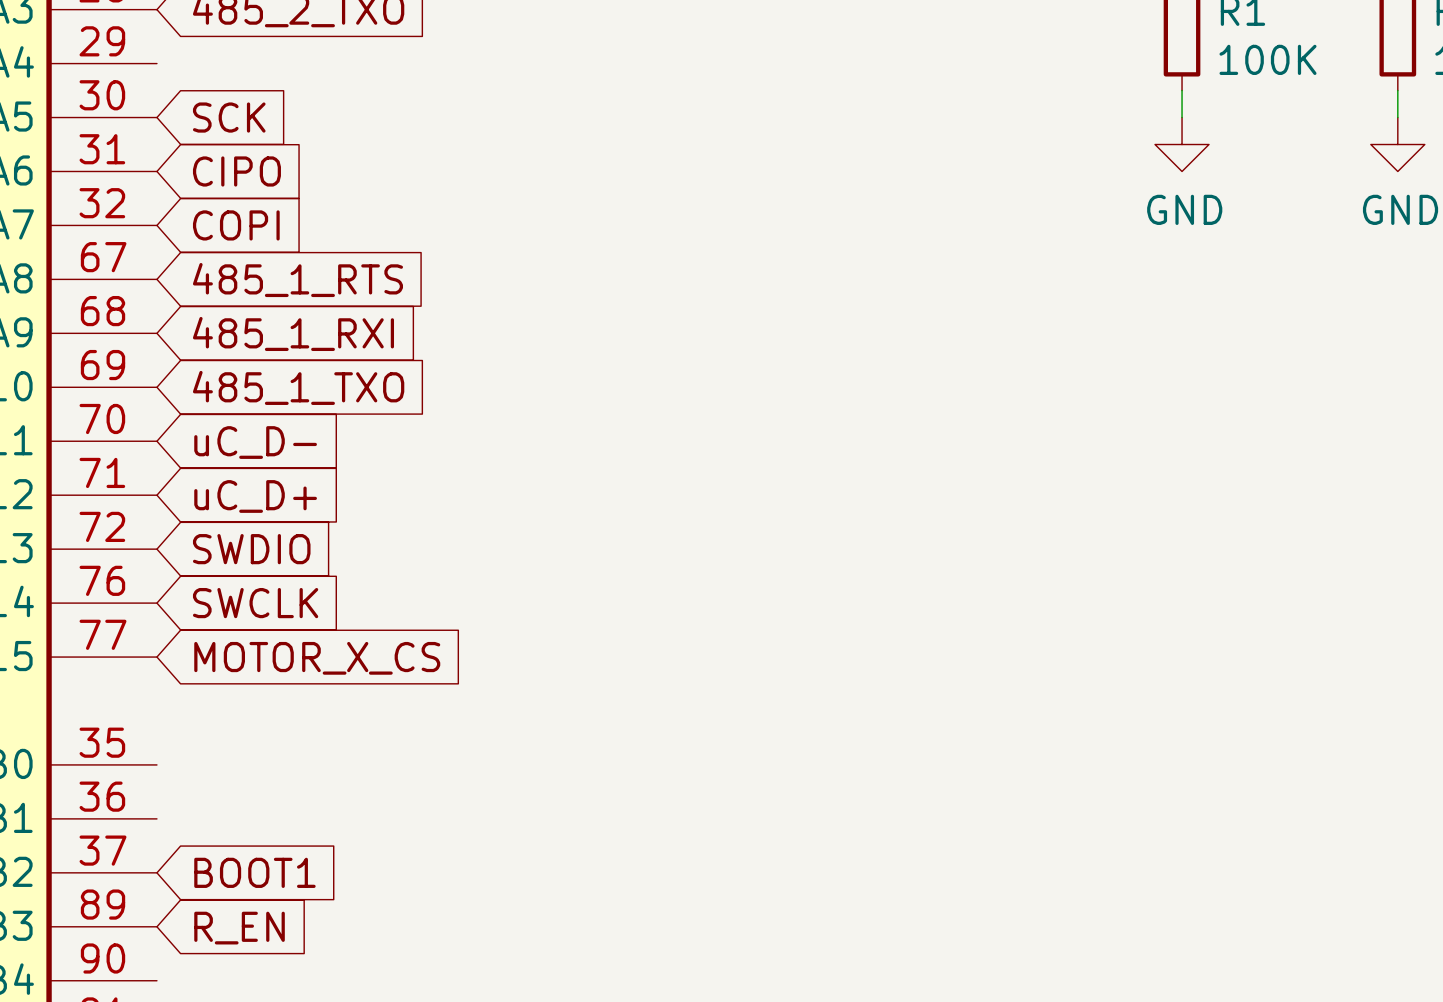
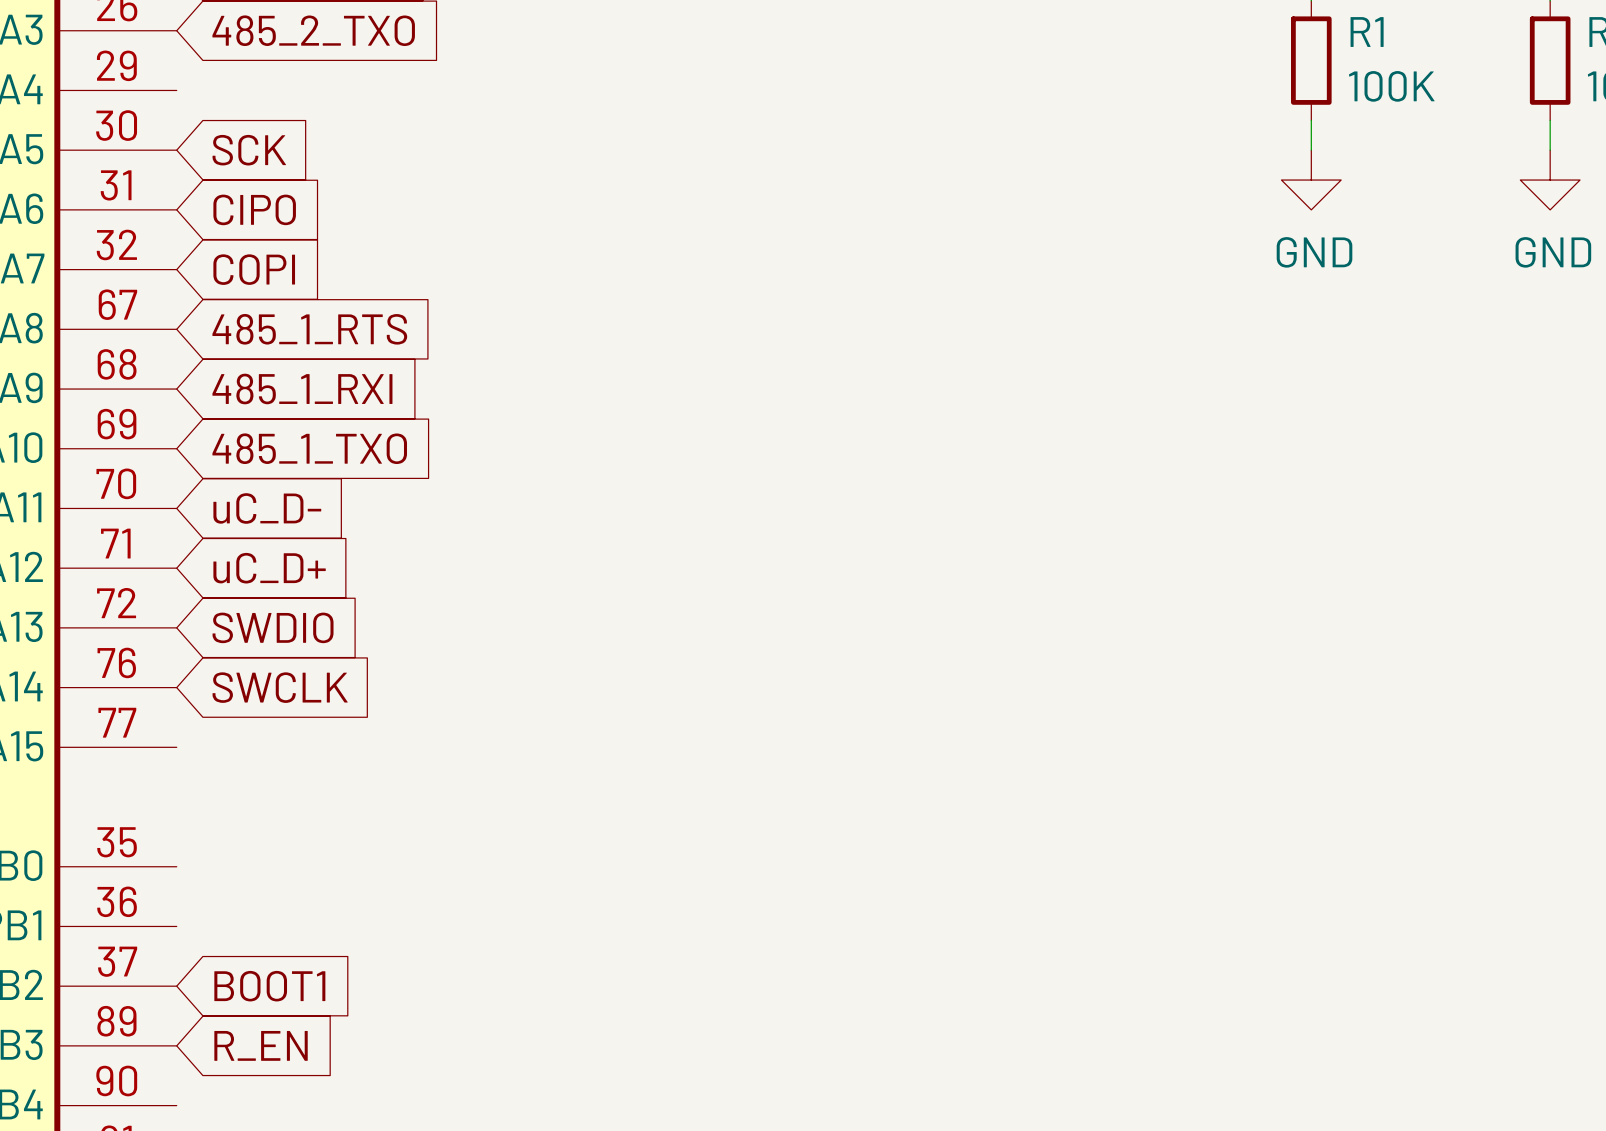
global label: MOTOR_X_CS (317, 658) -> none

